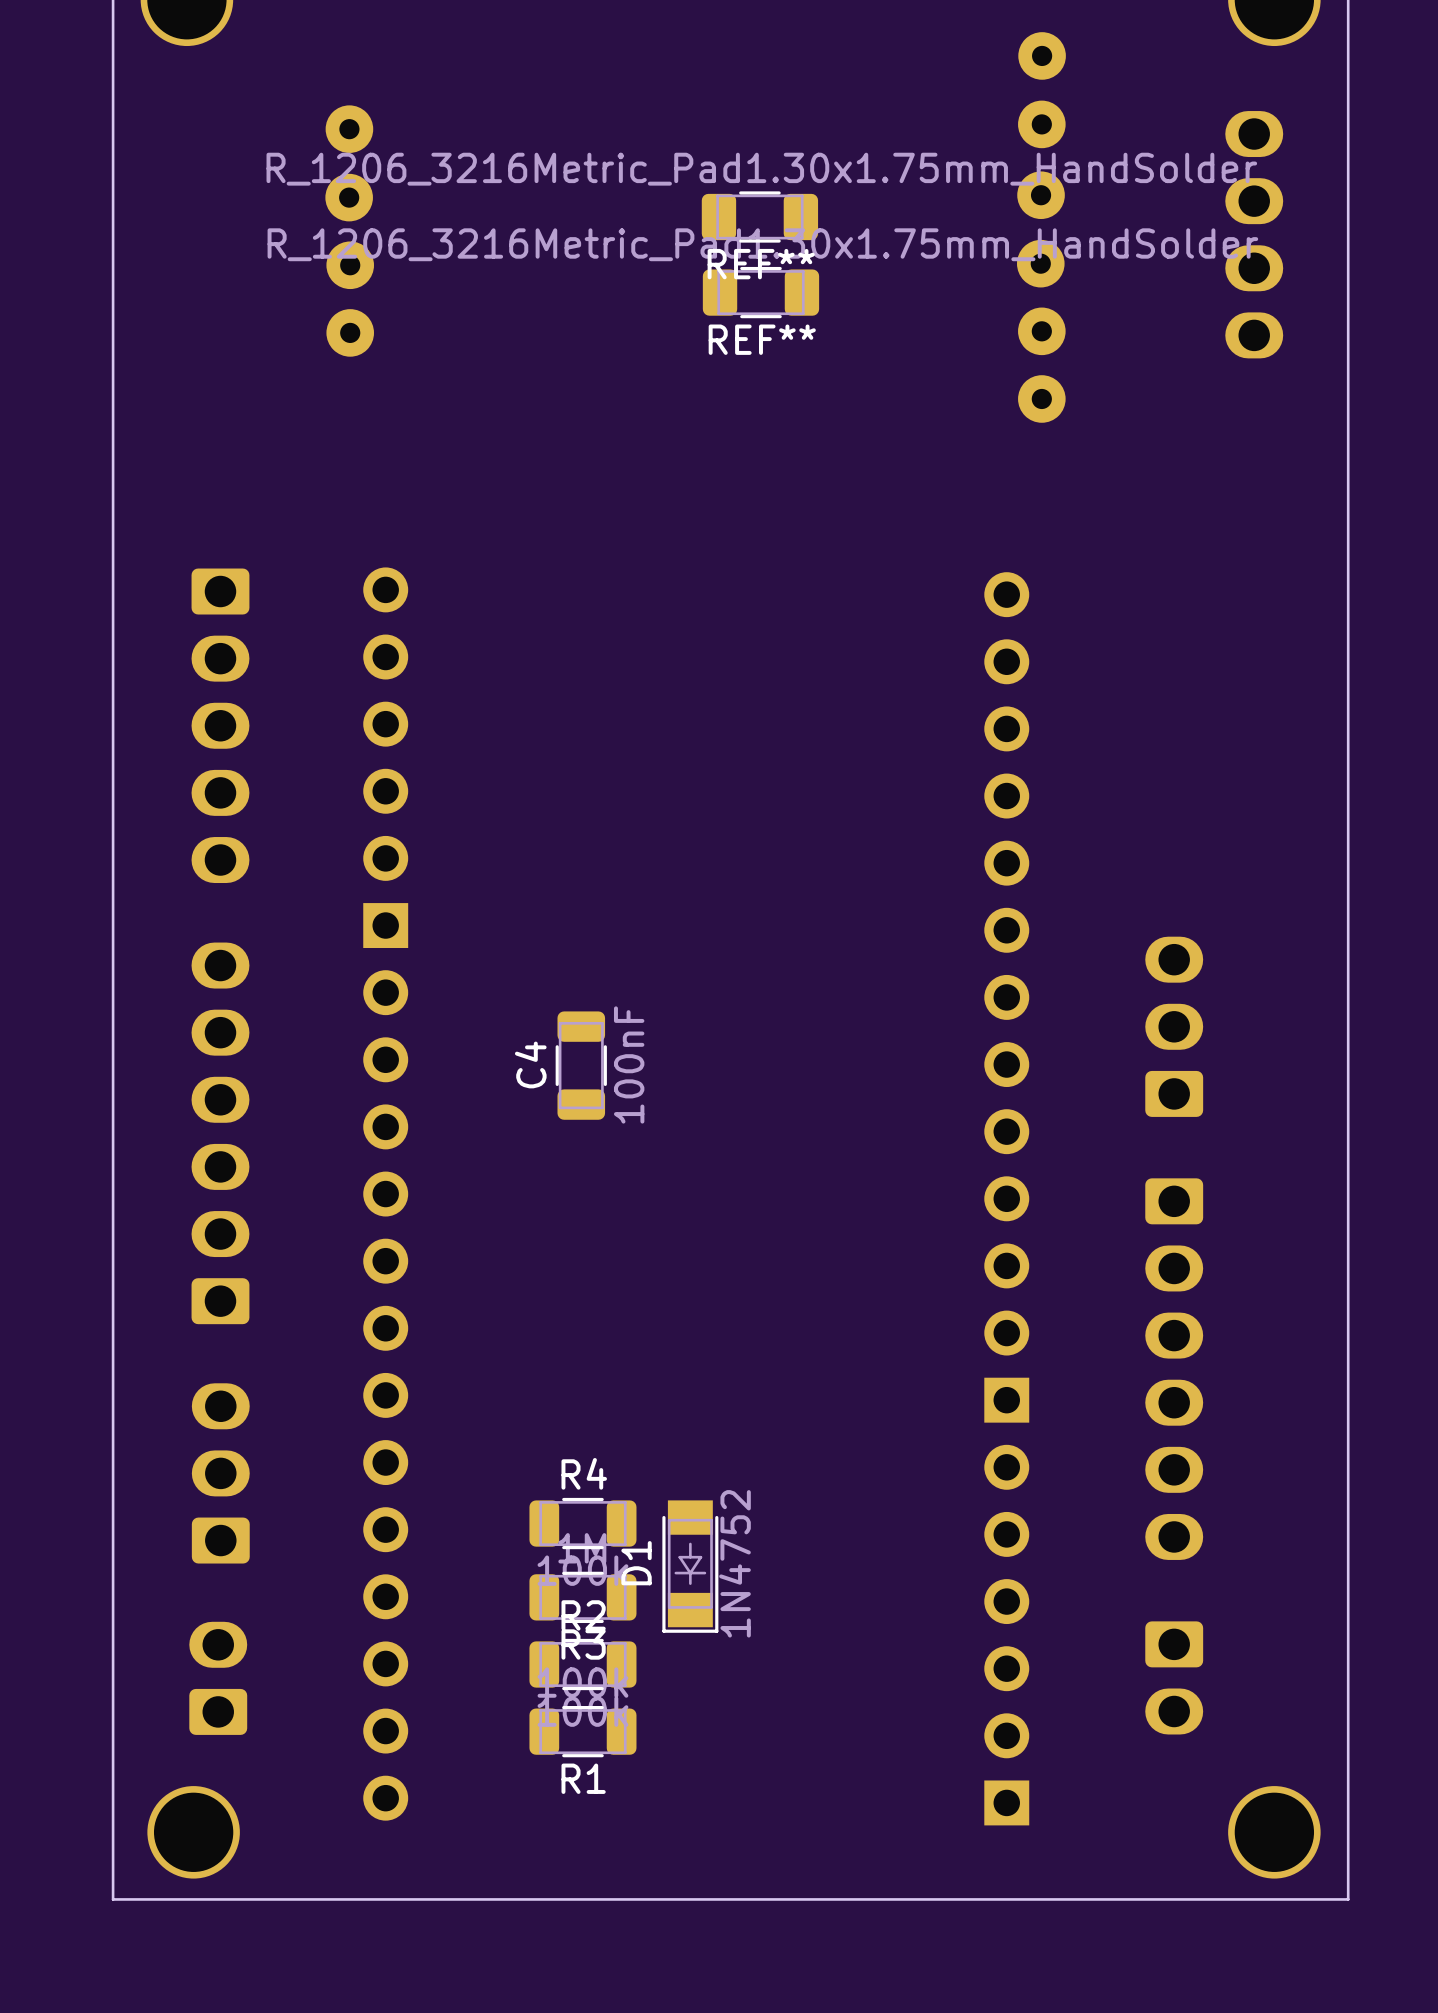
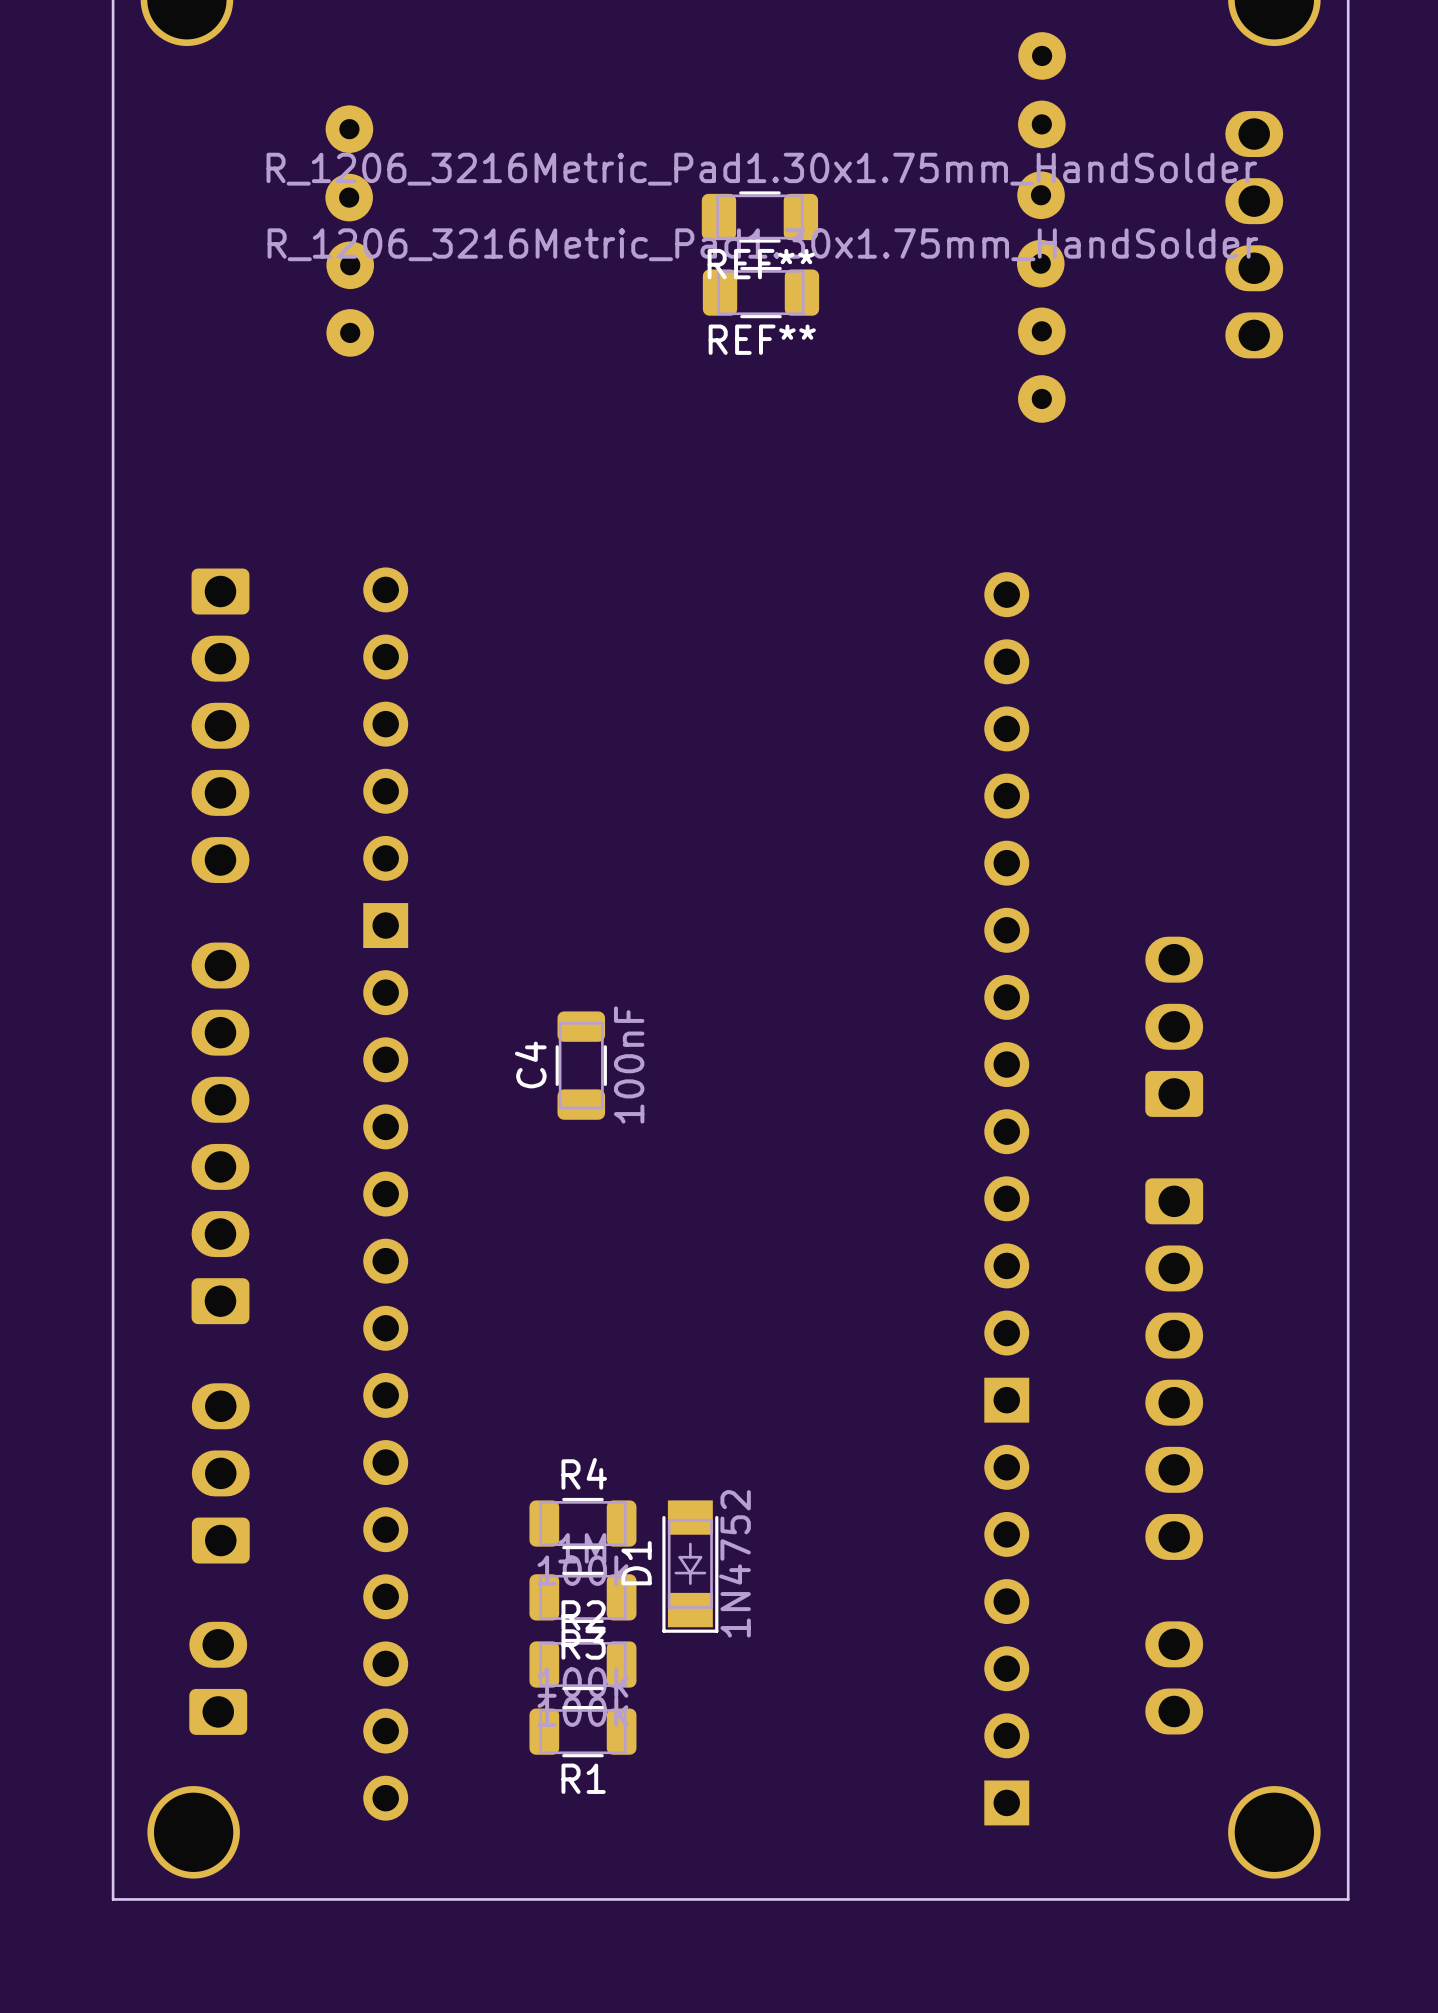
part footprint: [1145, 1621, 1204, 1735] -> [1145, 1621, 1204, 1735]

